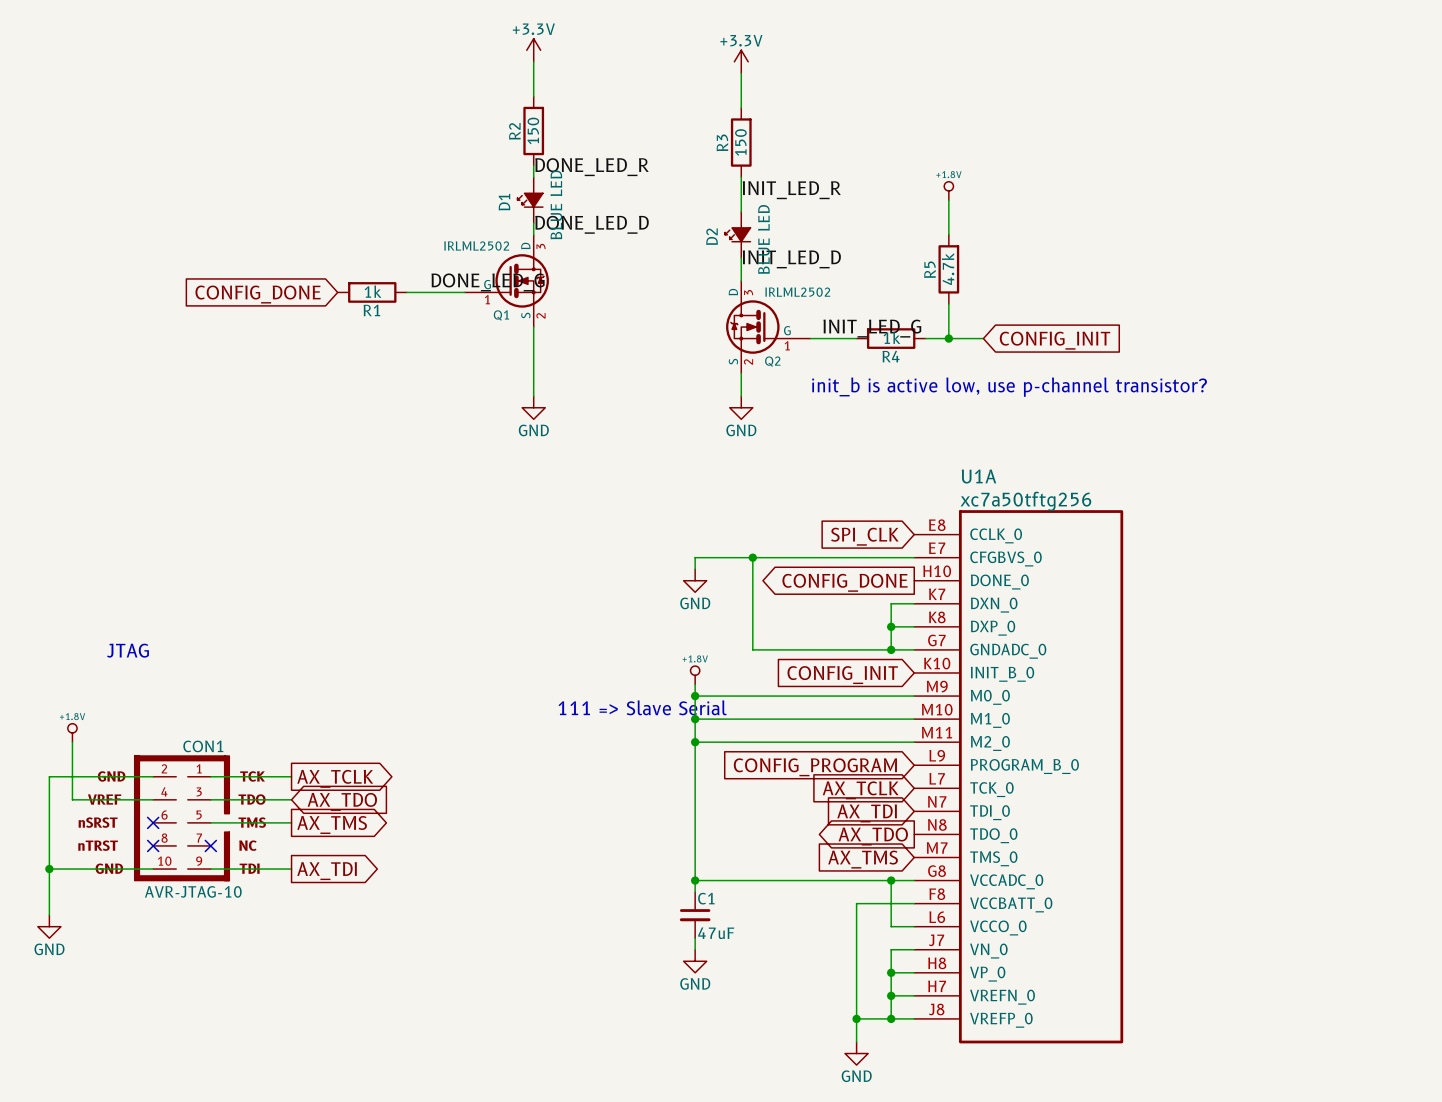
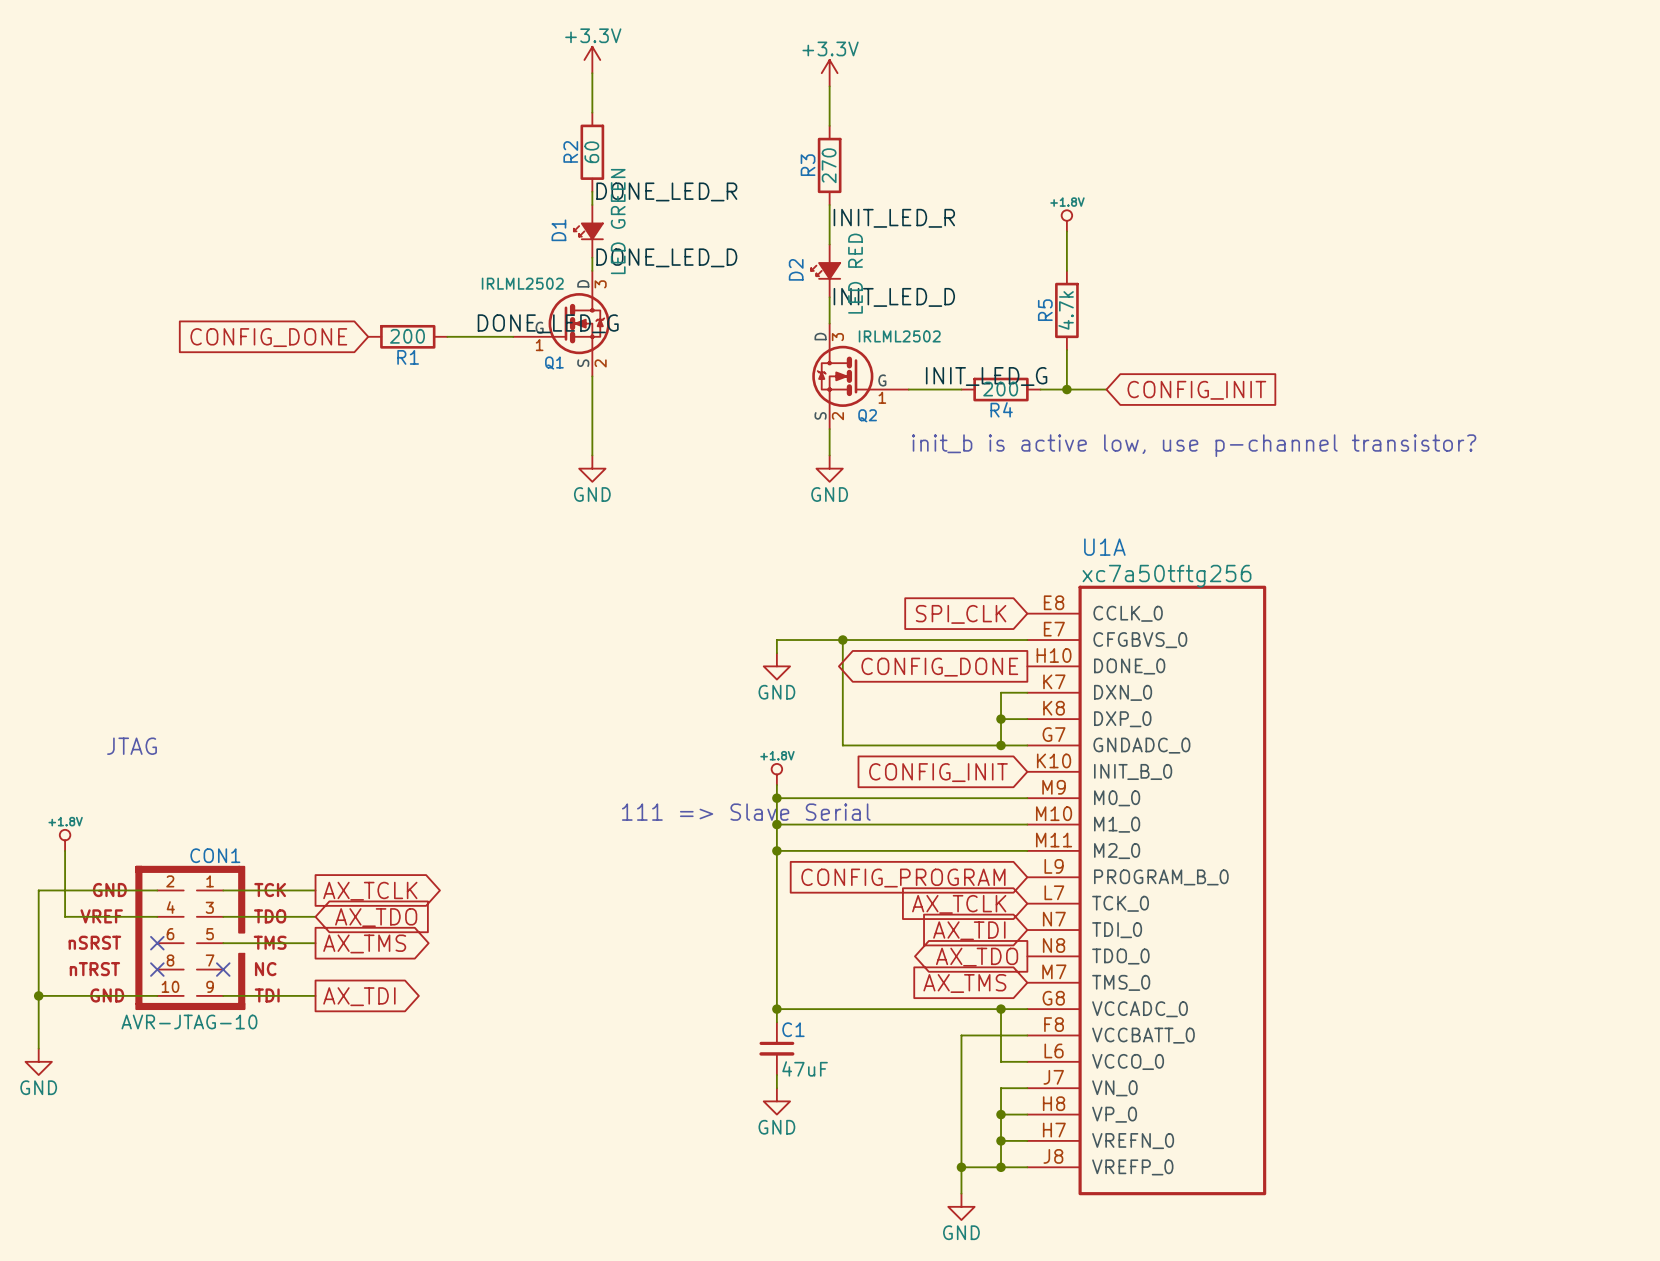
R2 value: 150 (533, 130) -> 60 (591, 152)
R3 value: 150 (740, 142) -> 270 (829, 165)
D1 value: BLUE LED (556, 204) -> LED GREEN (618, 221)
D2 value: BLUE LED (763, 239) -> LED RED (855, 273)
R1 value: 1k (373, 291) -> 200 (407, 336)
R4 value: 1k (891, 337) -> 200 (1000, 389)

